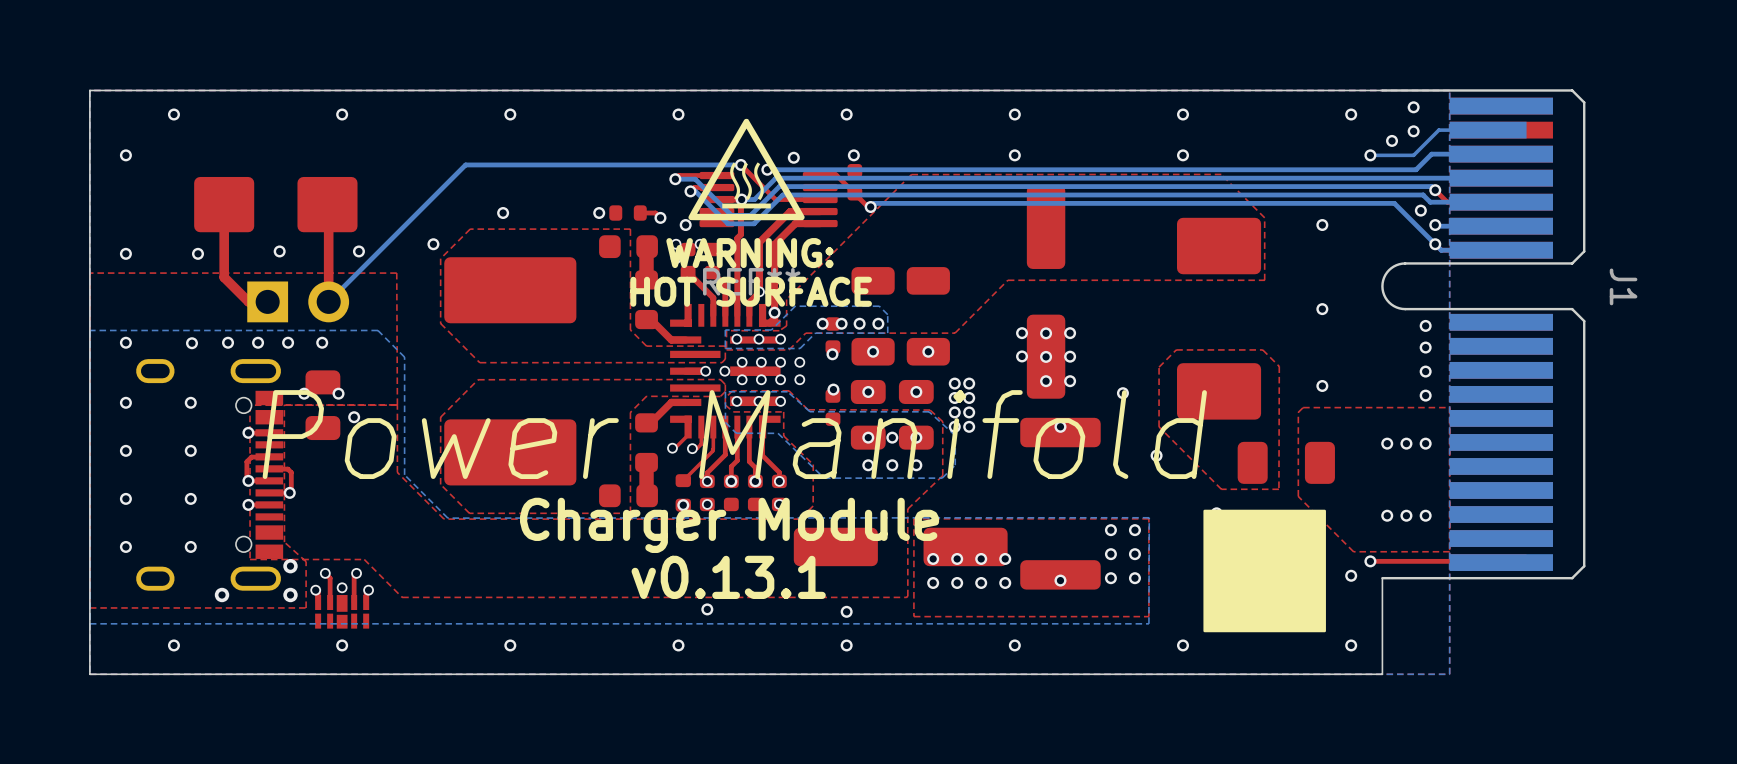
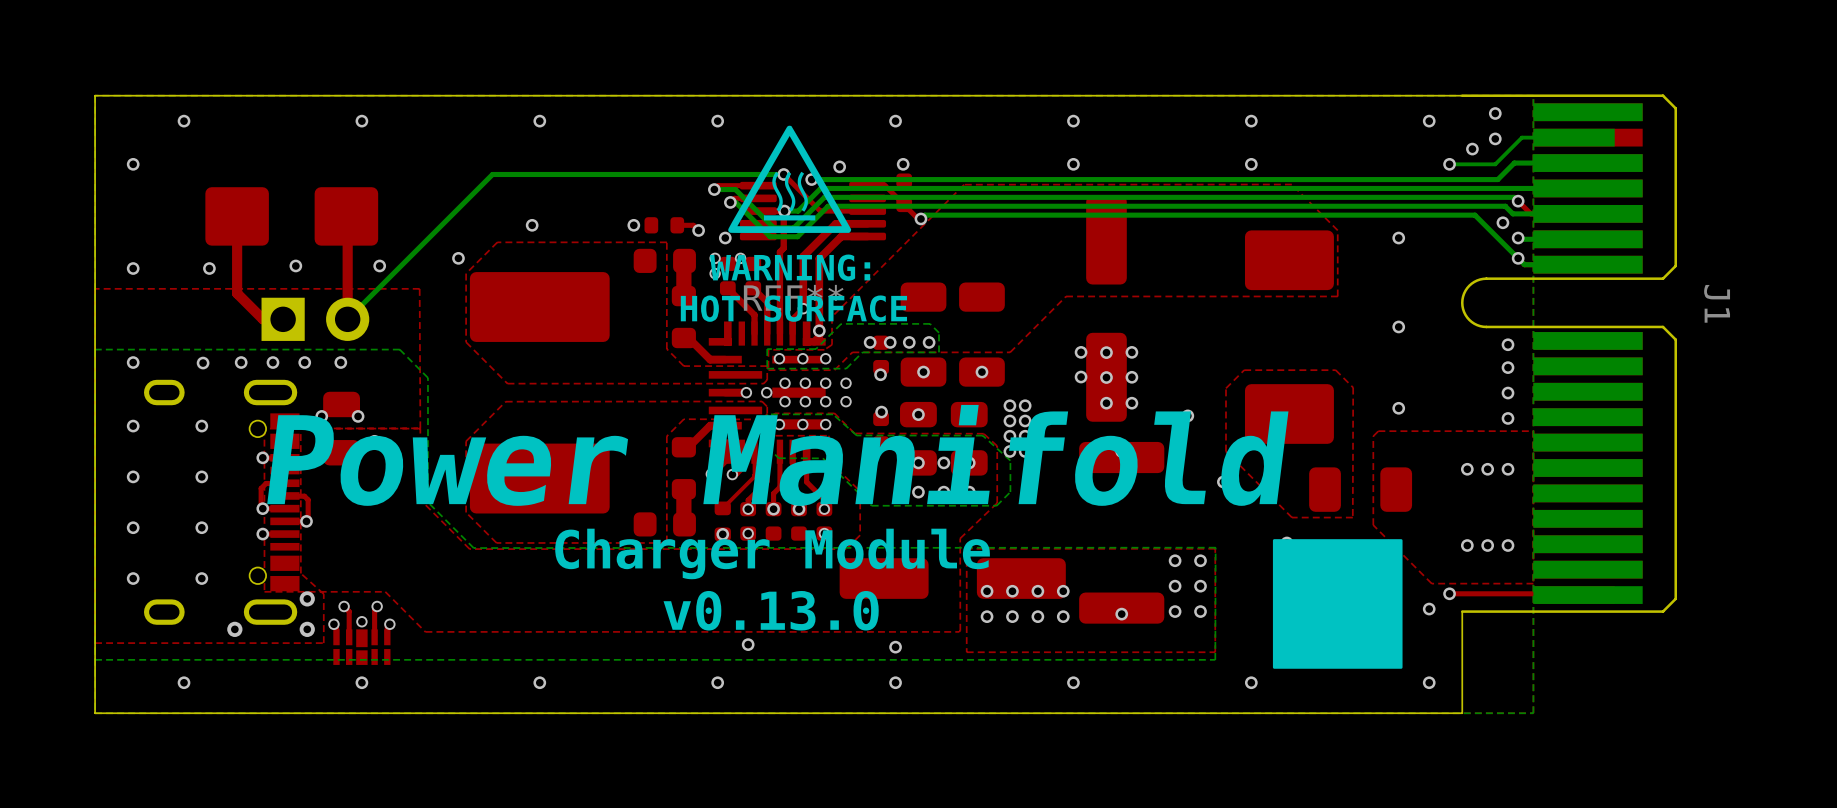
text: v0.13.1 (728, 577) -> v0.13.0 (771, 610)

